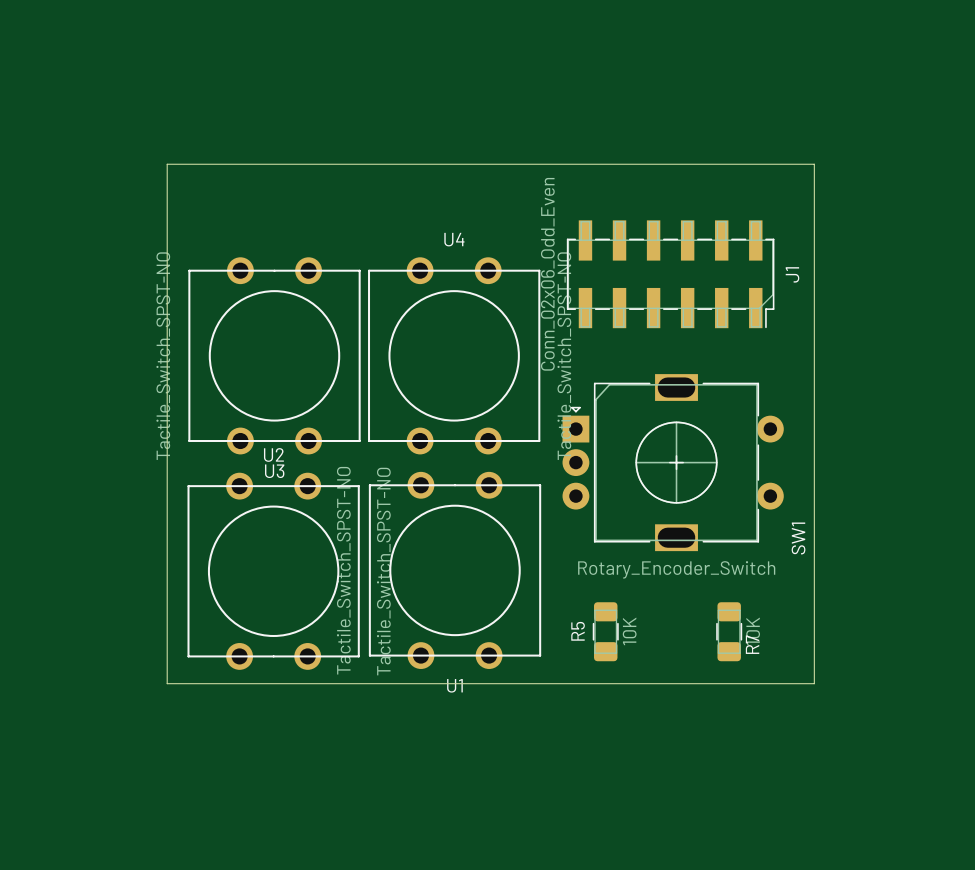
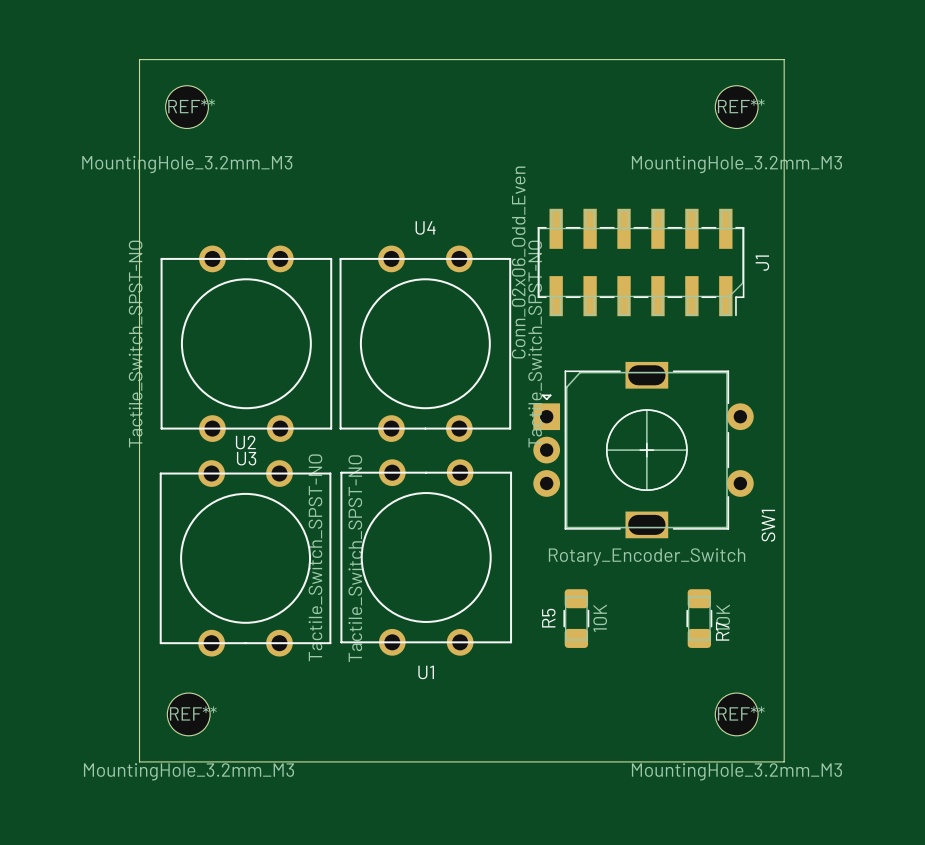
REF**: none -> MountingHole_3.2mm_M3 (187, 107)
REF**: none -> MountingHole_3.2mm_M3 (736, 107)
board edge: (167, 164) (814, 164) -> (139, 152) (139, 59) (784, 59) (784, 152)
board edge: (167, 683) (814, 683) -> (139, 670) (139, 761) (784, 761) (784, 670)
REF**: none -> MountingHole_3.2mm_M3 (188, 714)
REF**: none -> MountingHole_3.2mm_M3 (736, 714)

